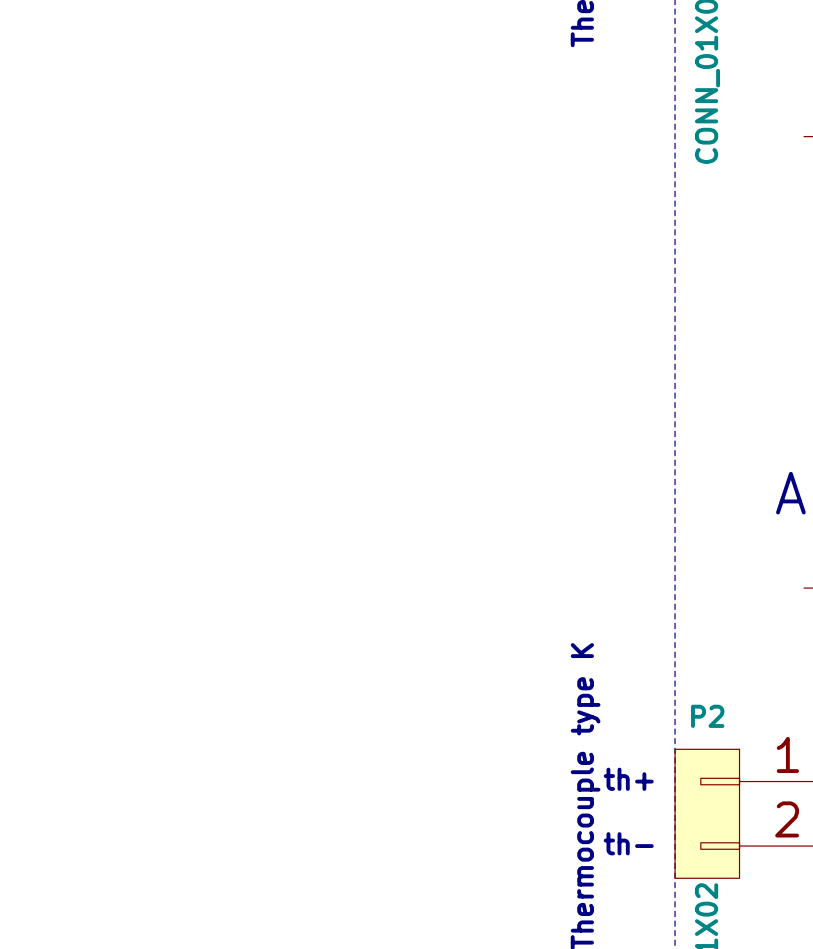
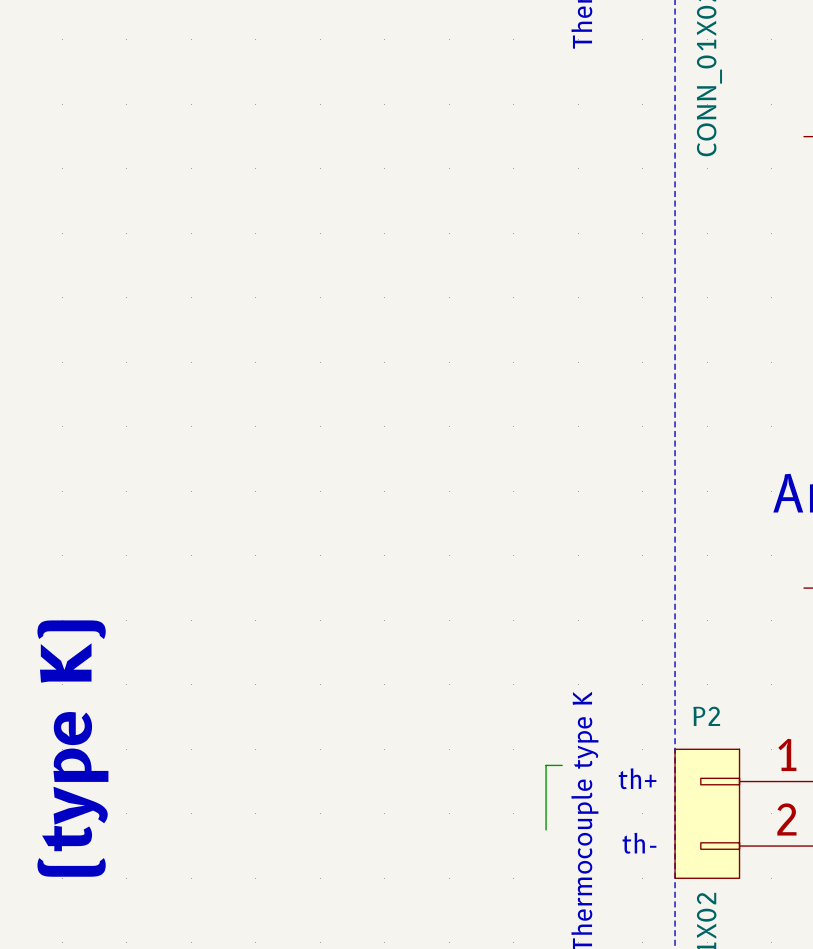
text: none -> (type K) (72, 748)
wire: none -> (562, 765) (546, 765) (546, 829)

